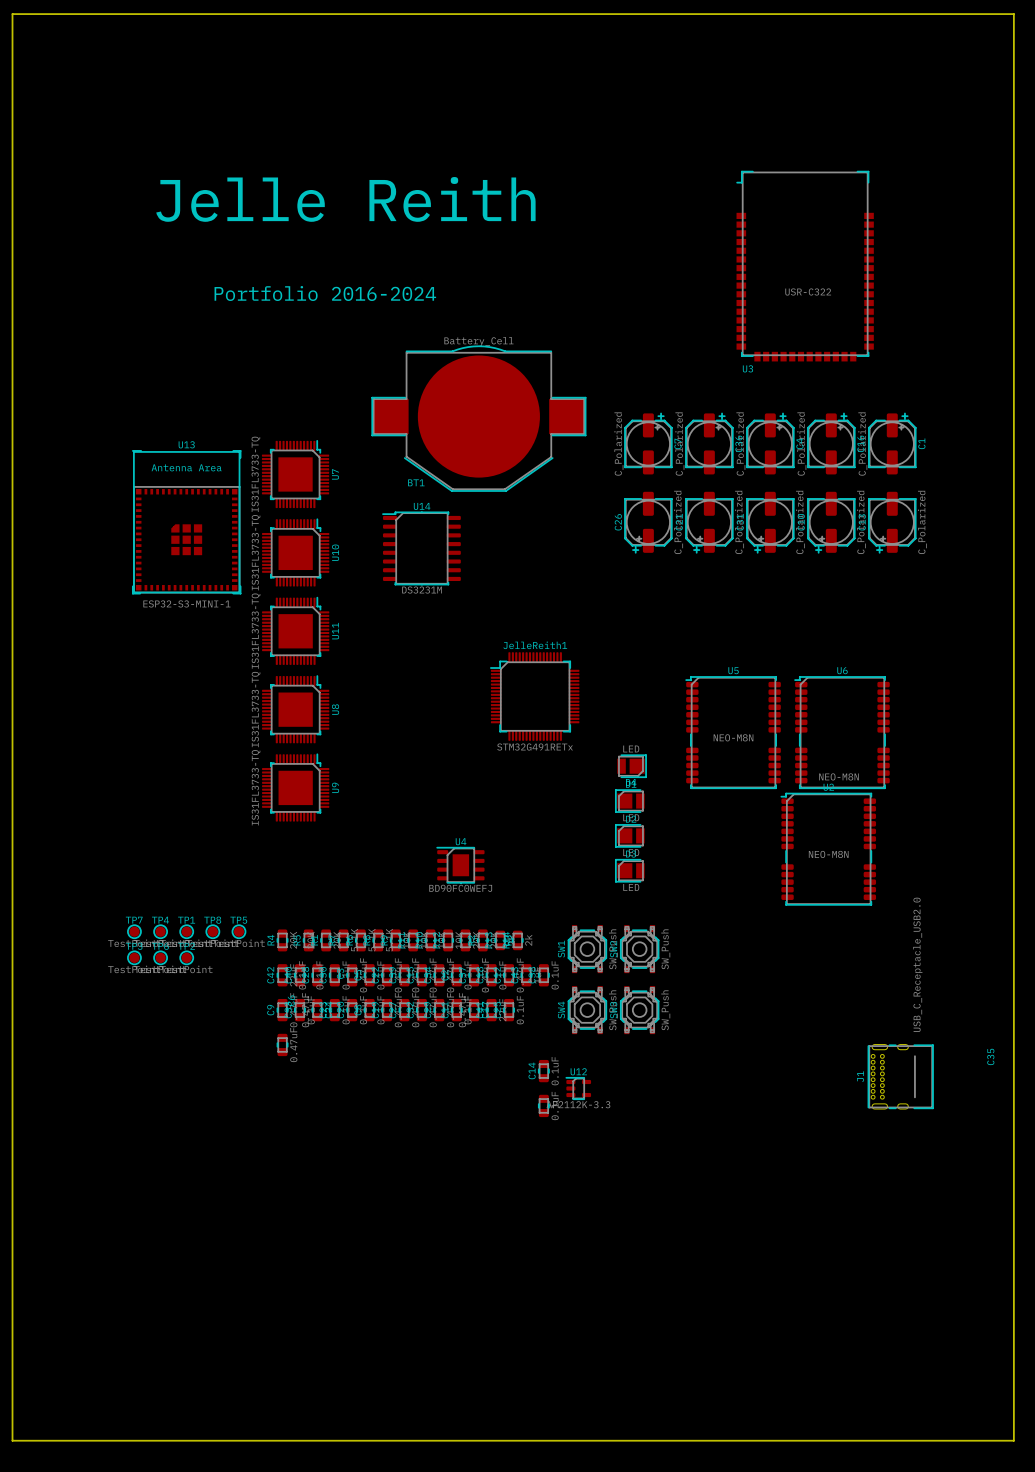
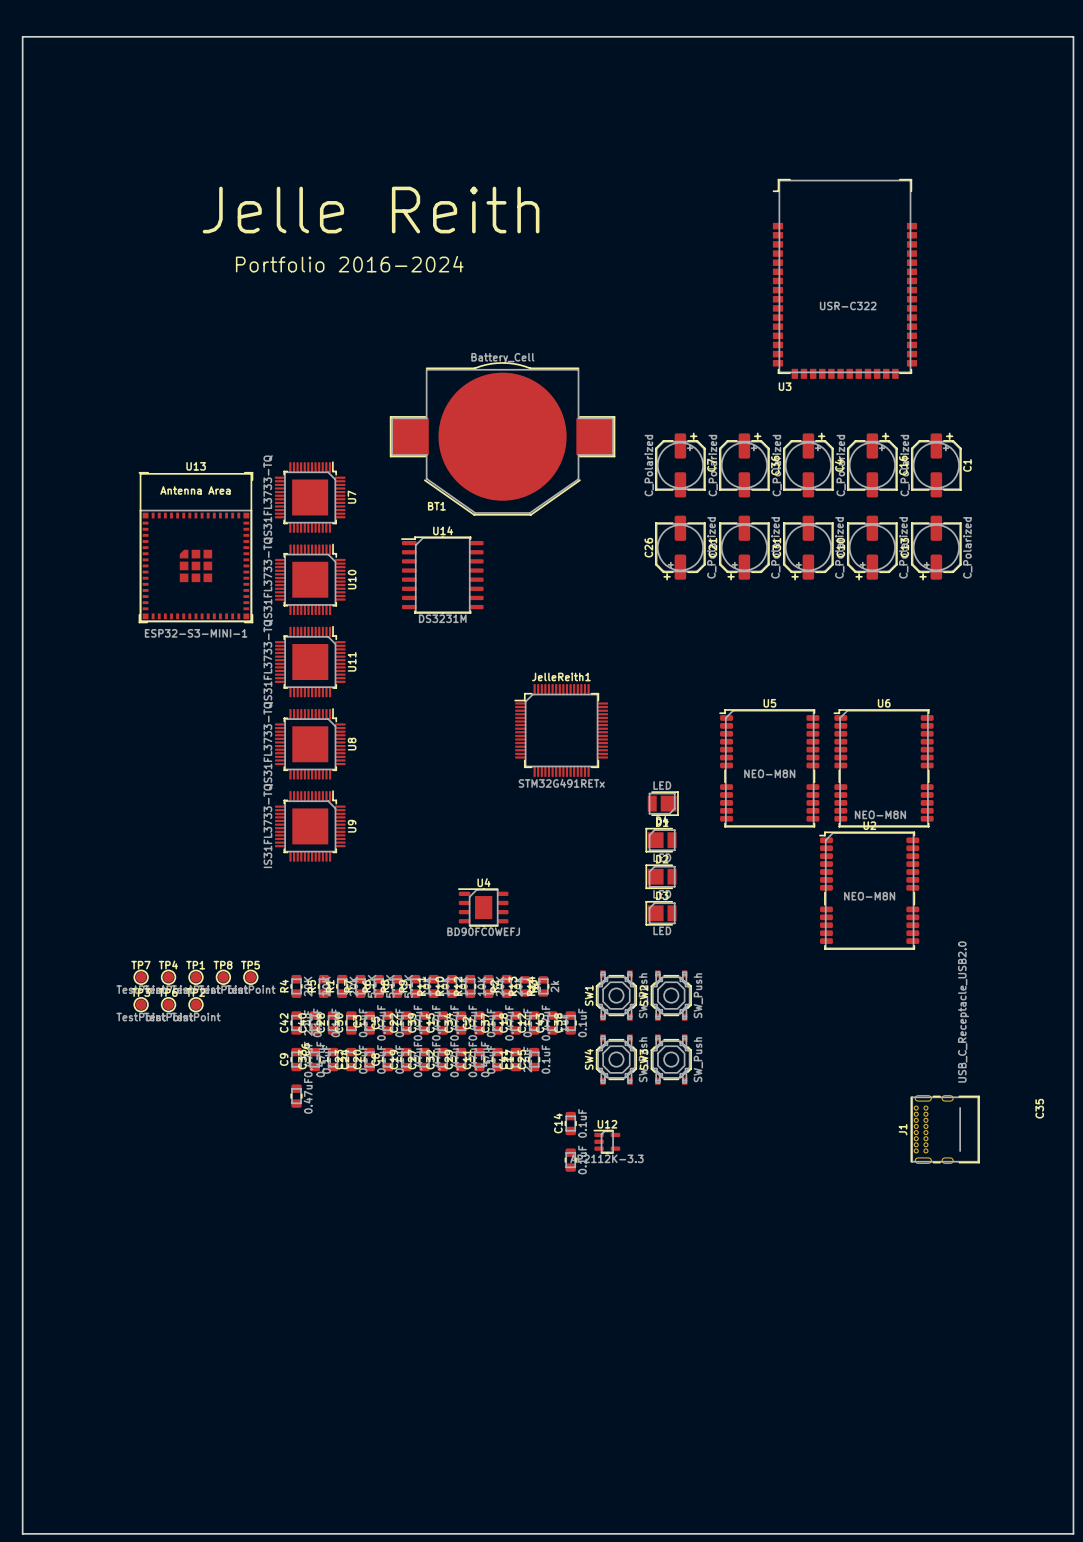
board edge: (12, 14) (1013, 14) (1013, 1440) (12, 1440) (12, 14) -> (22, 36) (1073, 36) (1073, 1533) (22, 1533) (22, 36)
text position: Jelle Reith (345, 199) -> Jelle Reith (371, 210)
text position: Portfolio 2016-2024 (325, 293) -> Portfolio 2016-2024 (349, 264)

